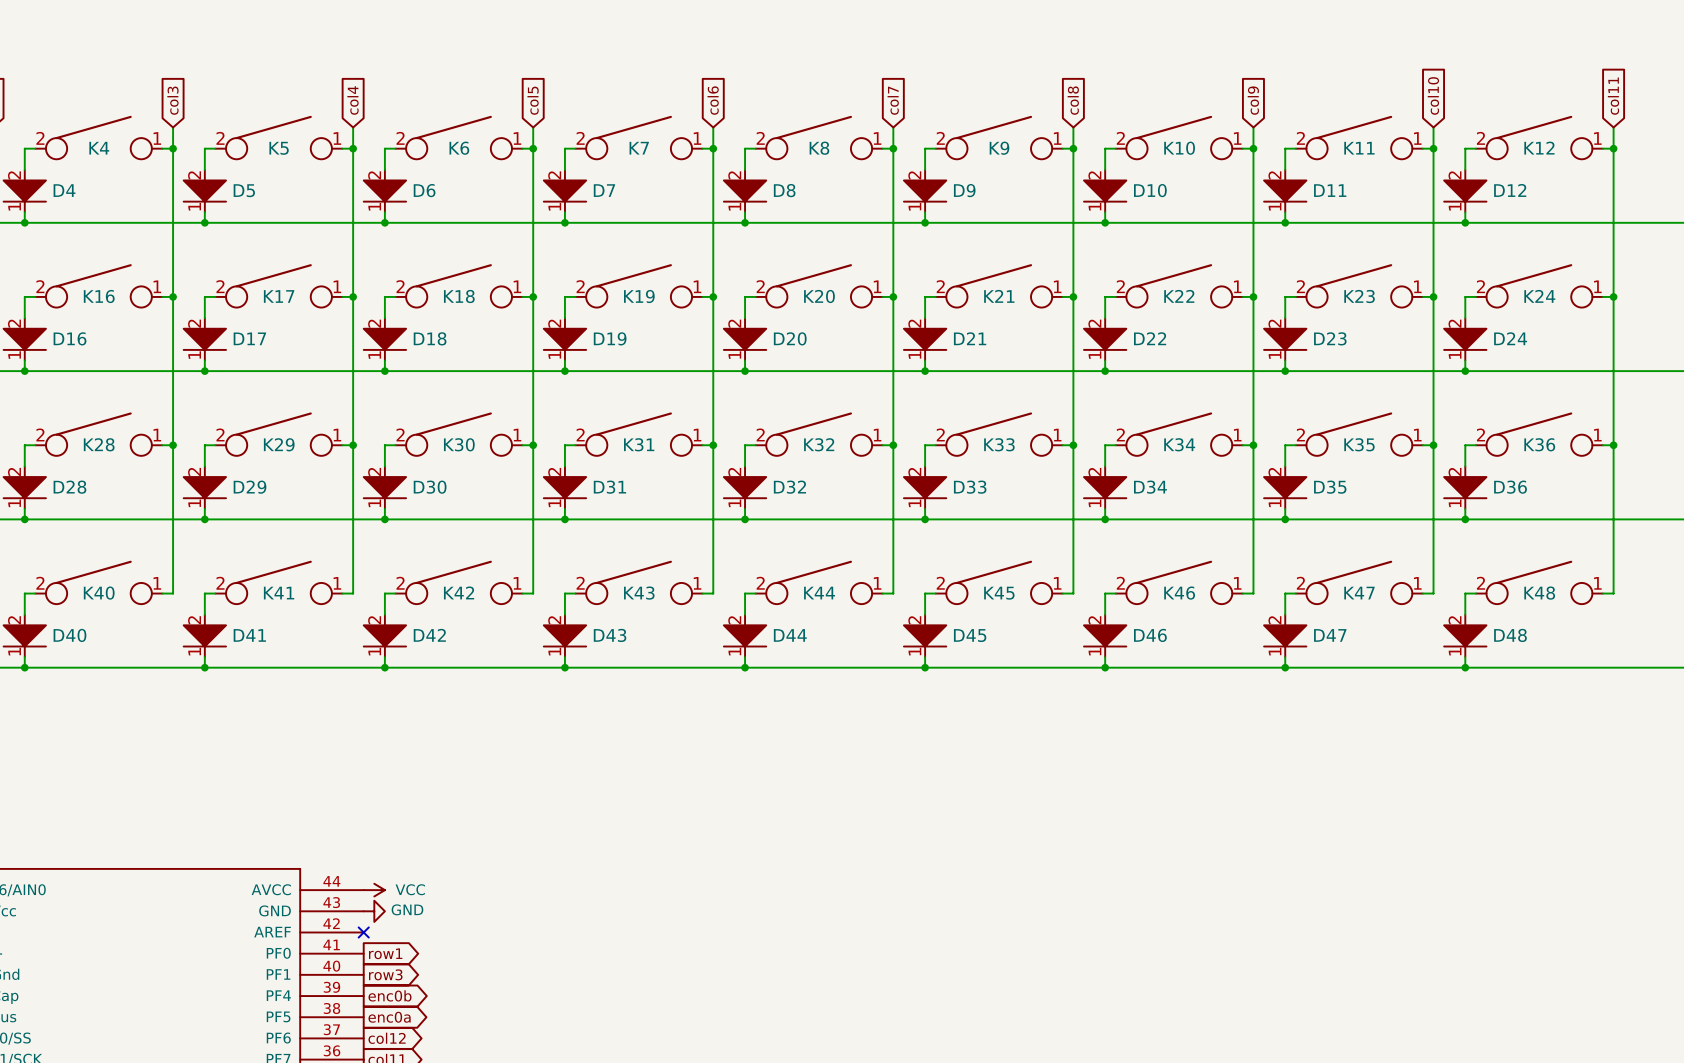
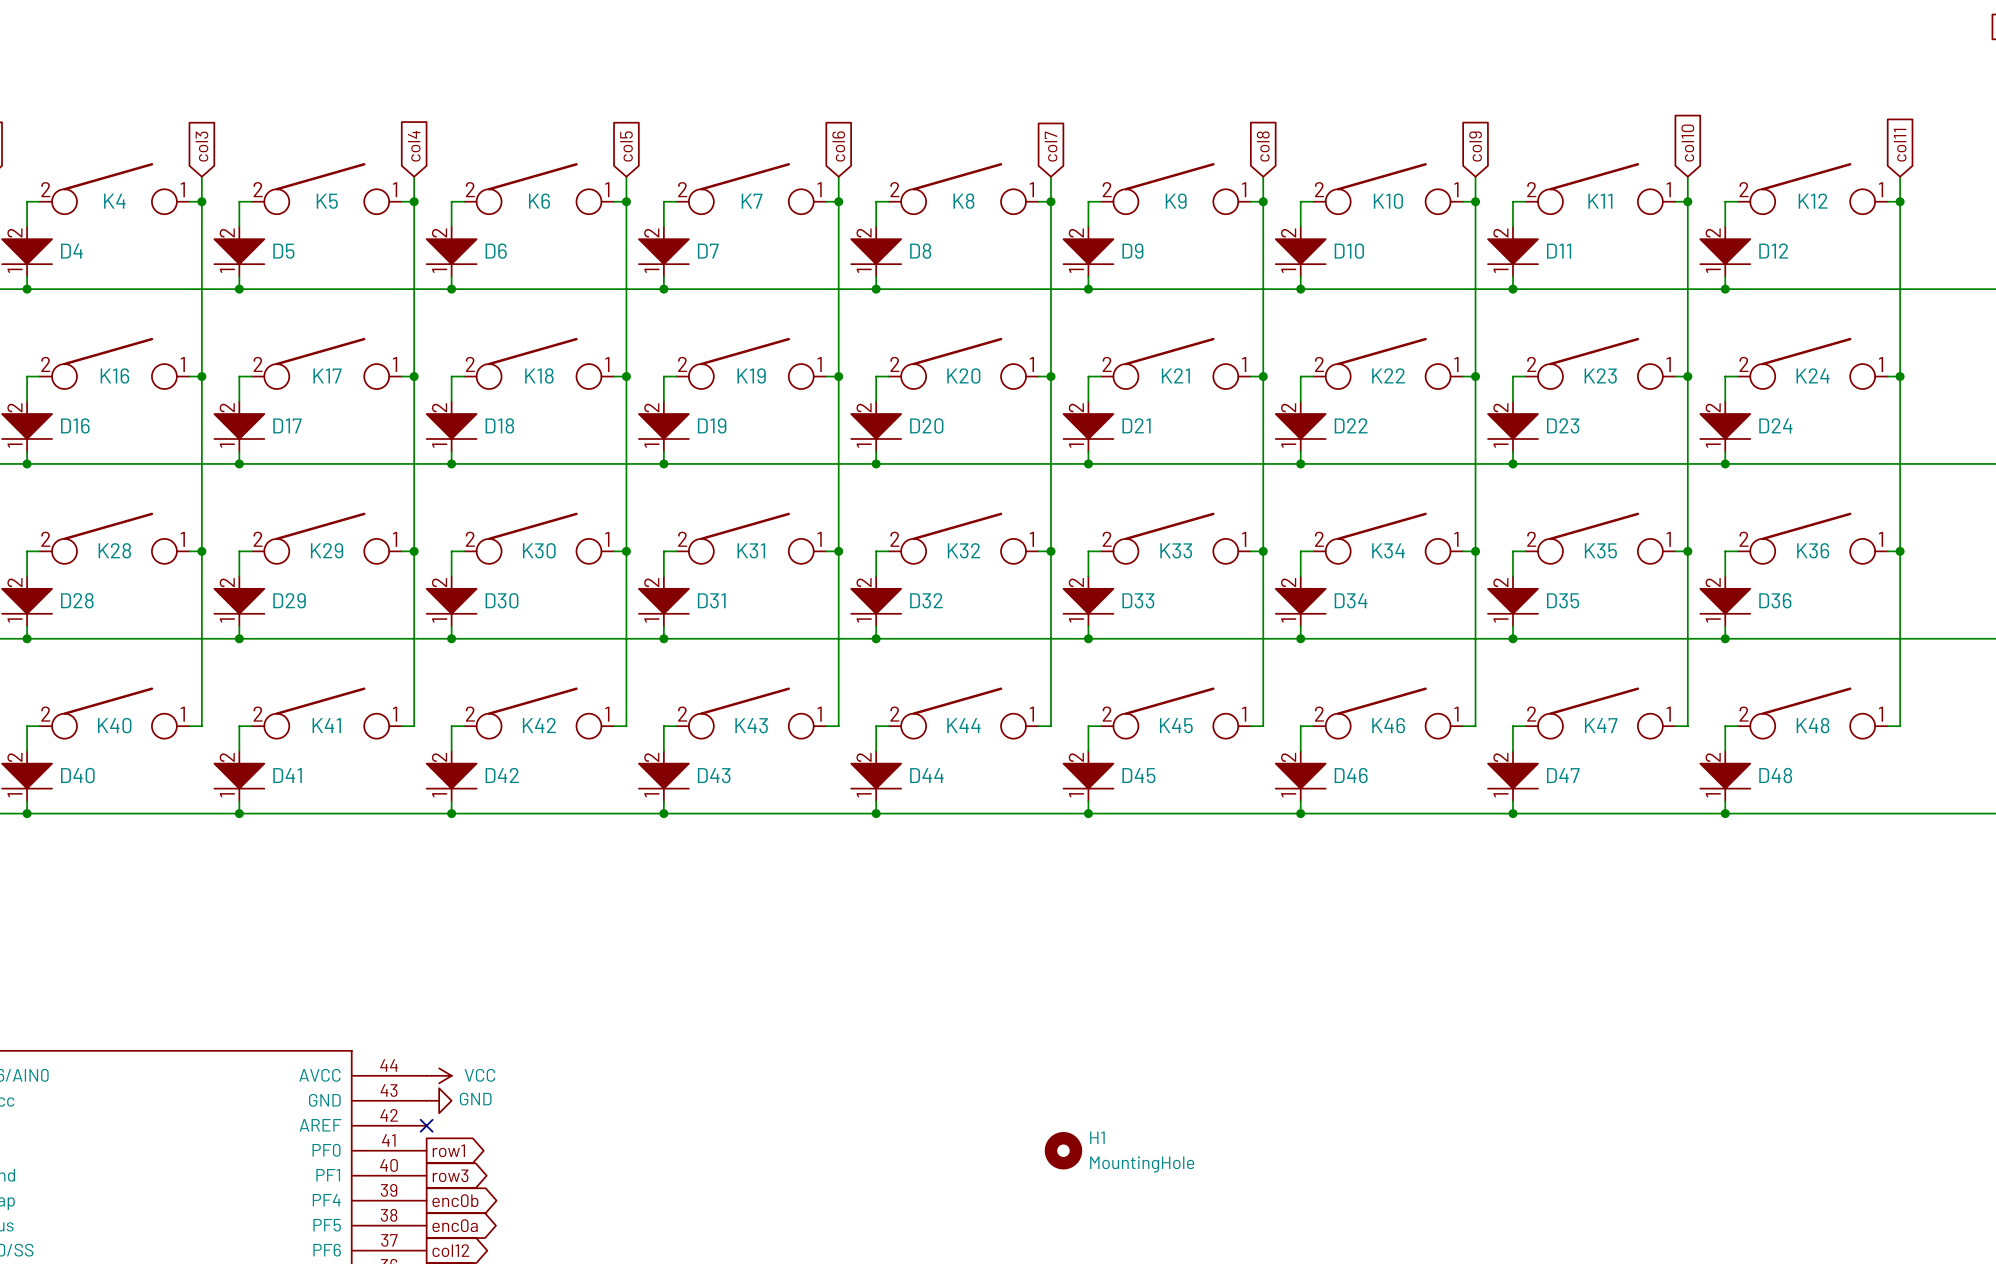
H1: none -> MountingHole (1063, 1150)

